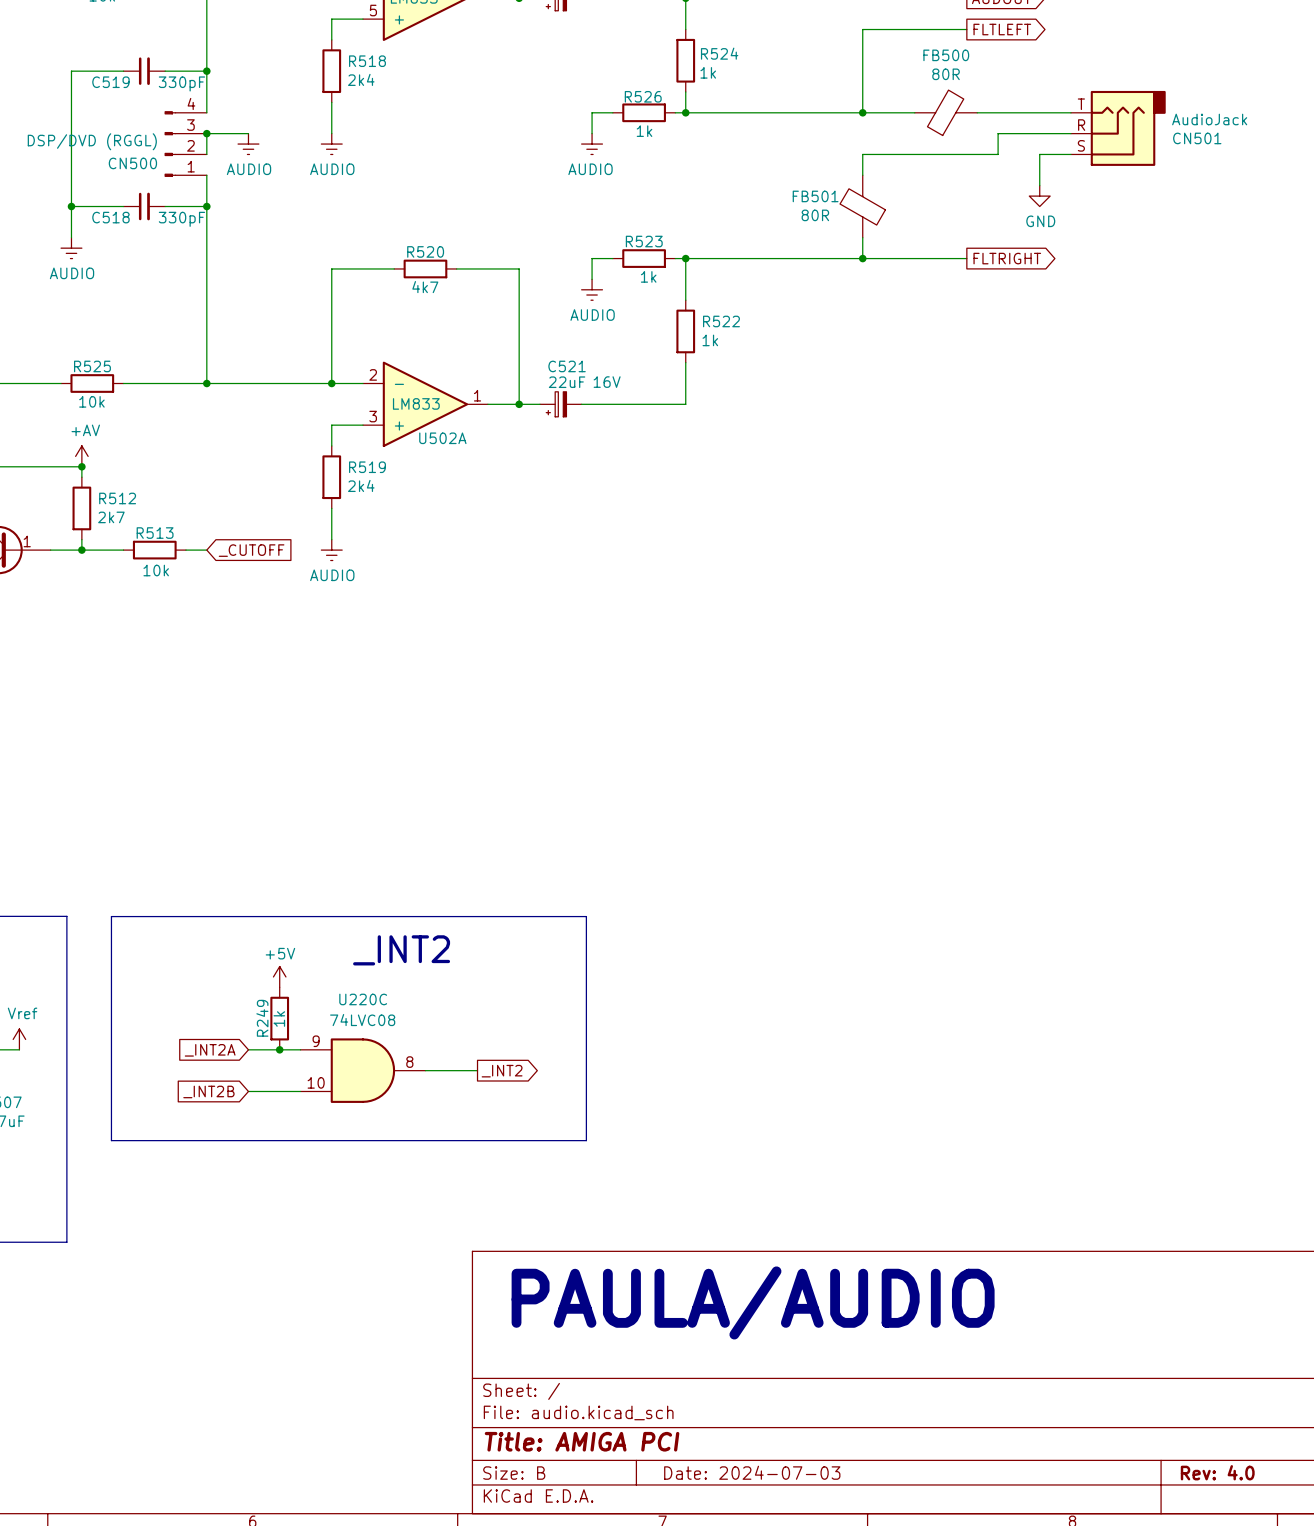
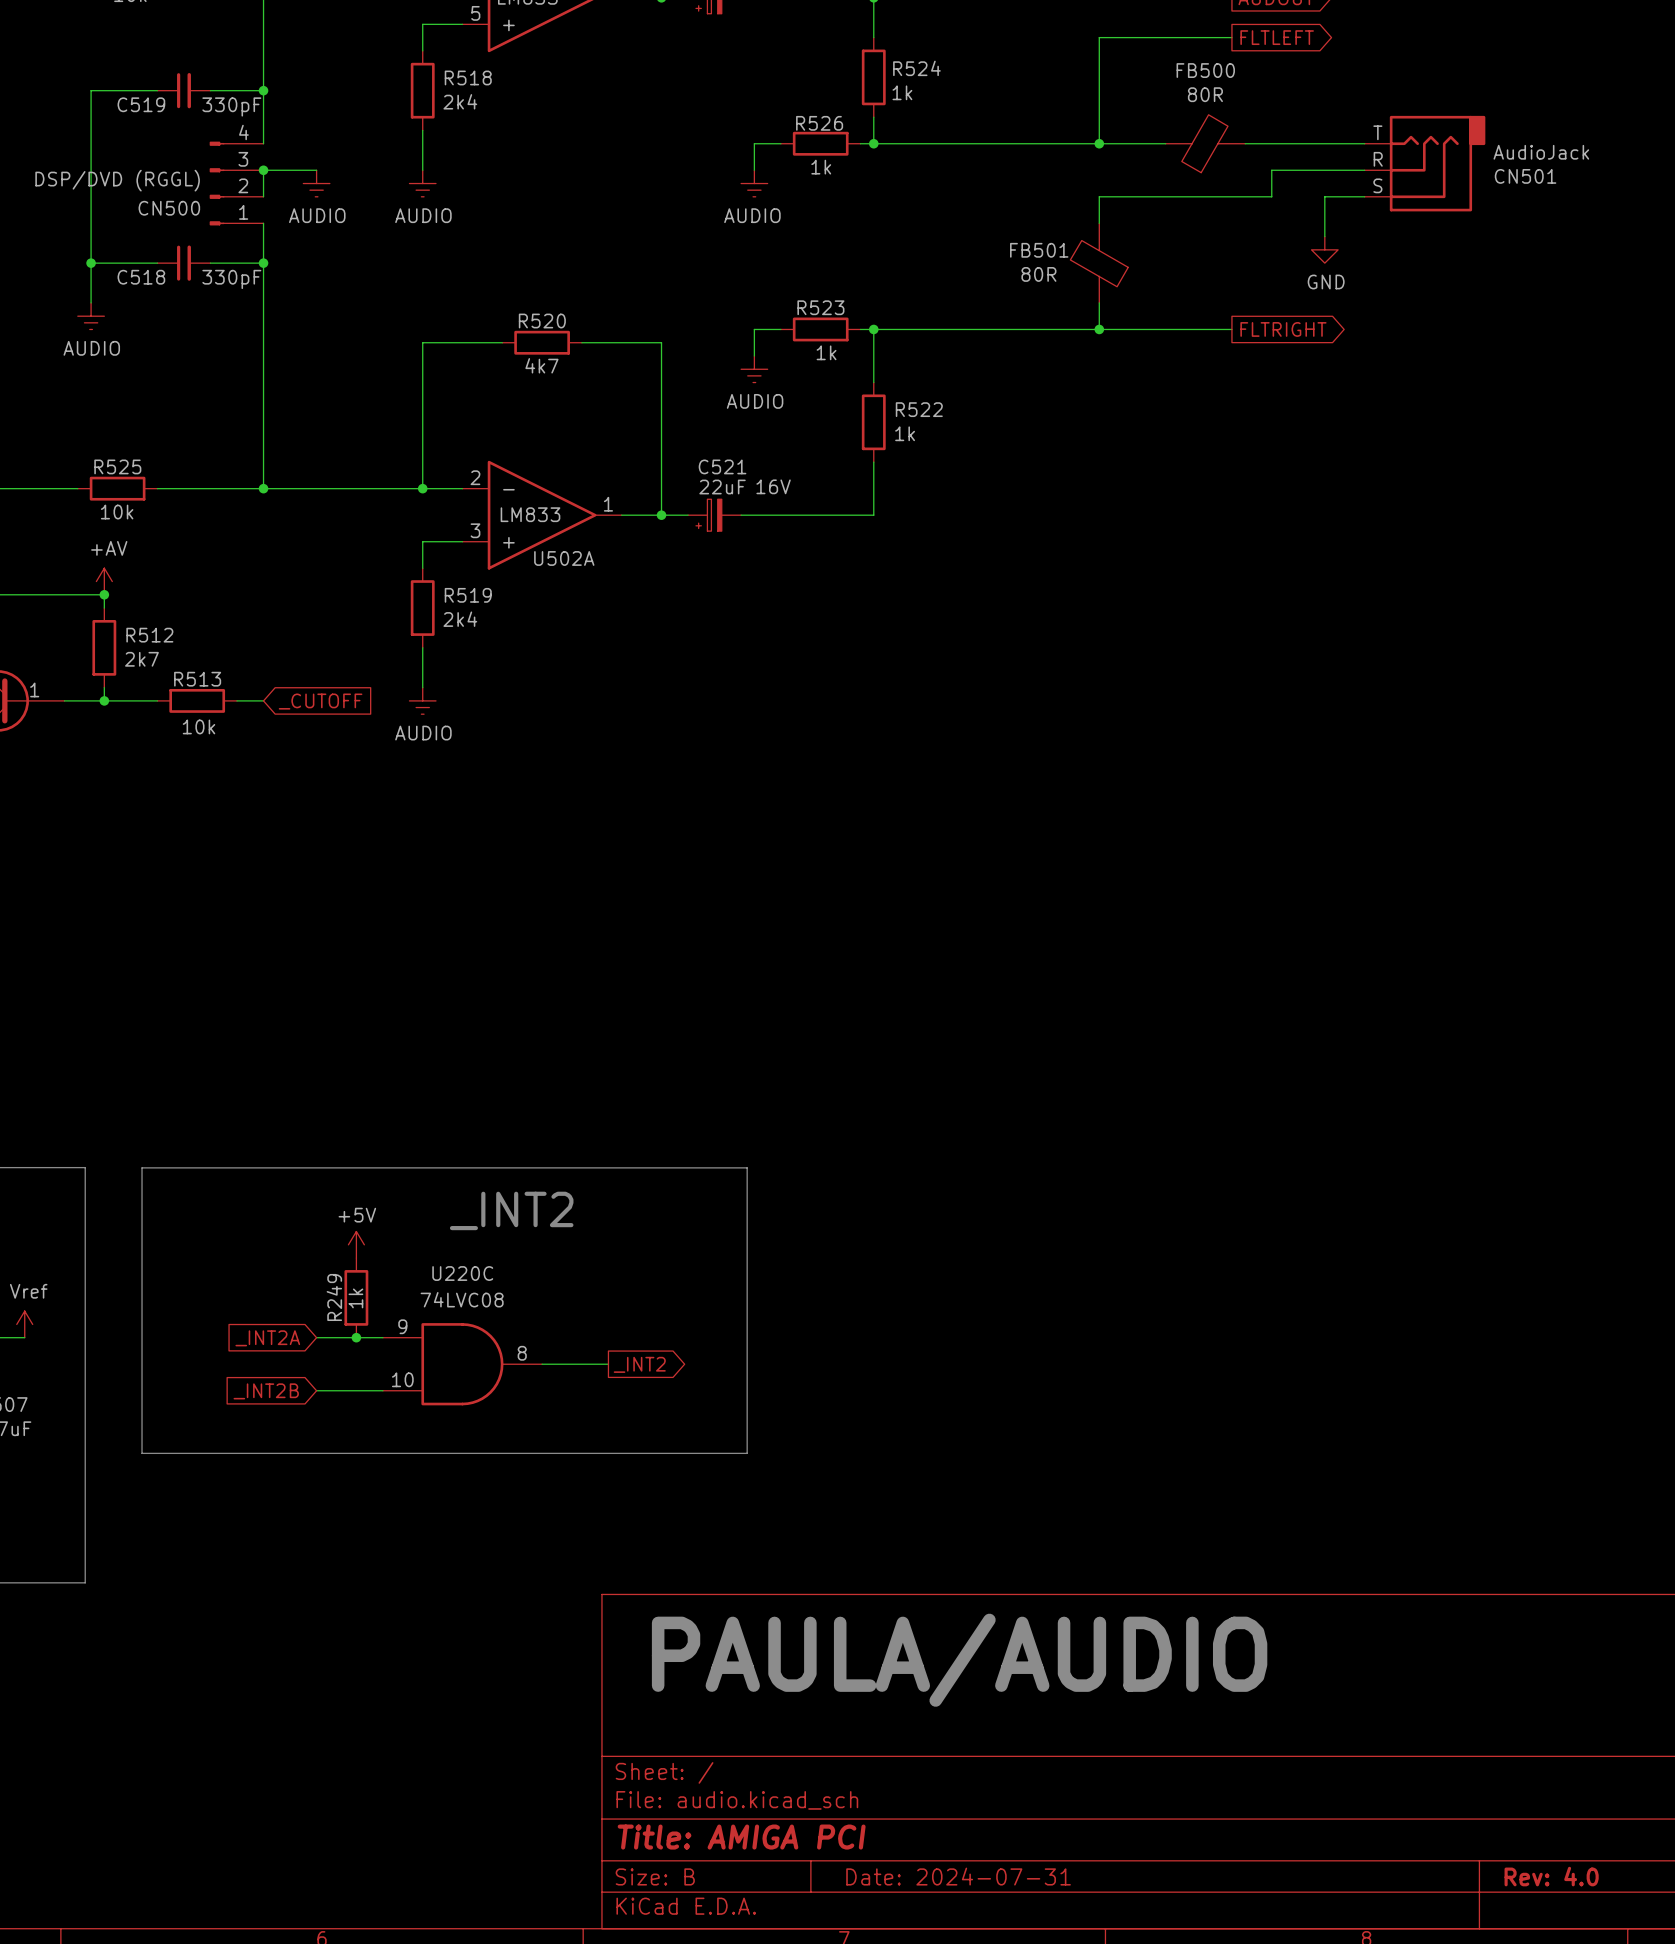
title block: Date: 2024-07-03 (752, 1472) -> Date: 2024-07-31 (958, 1876)

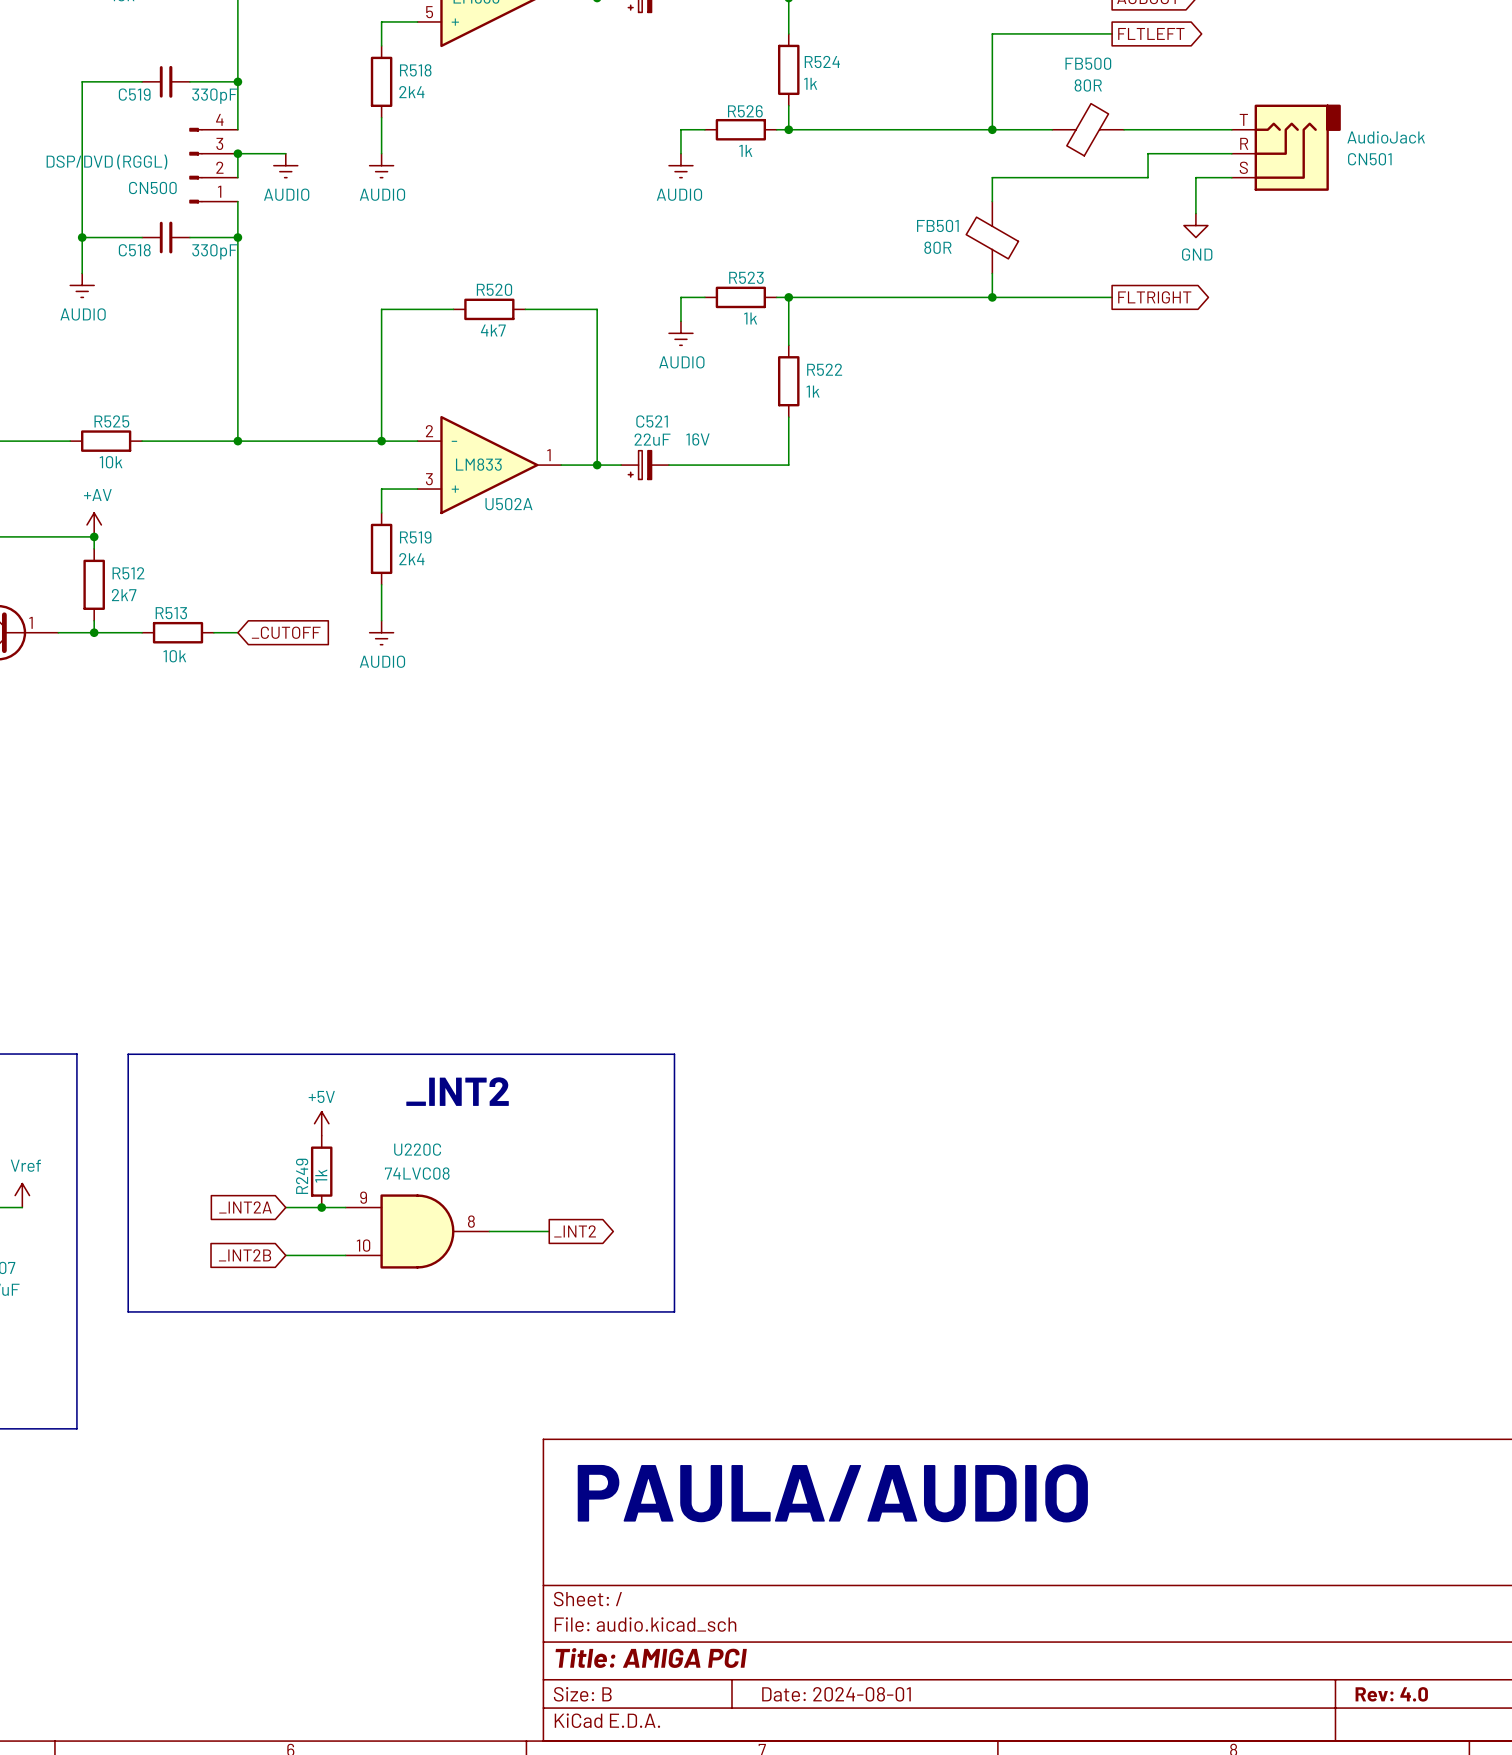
title block: Date: 2024-07-31 (958, 1876) -> Date: 2024-08-01 (836, 1694)

